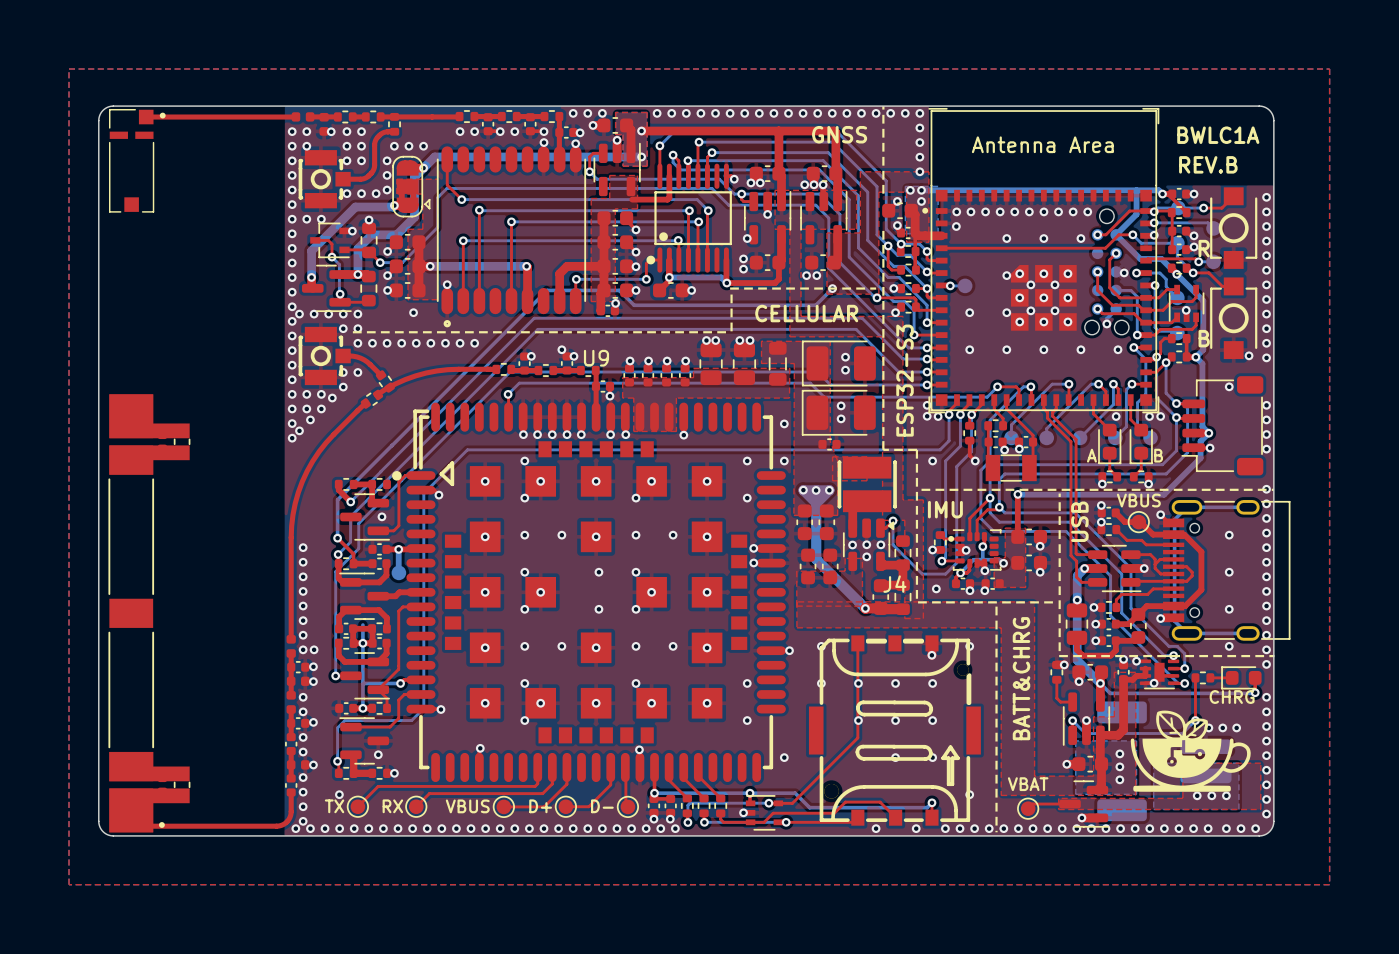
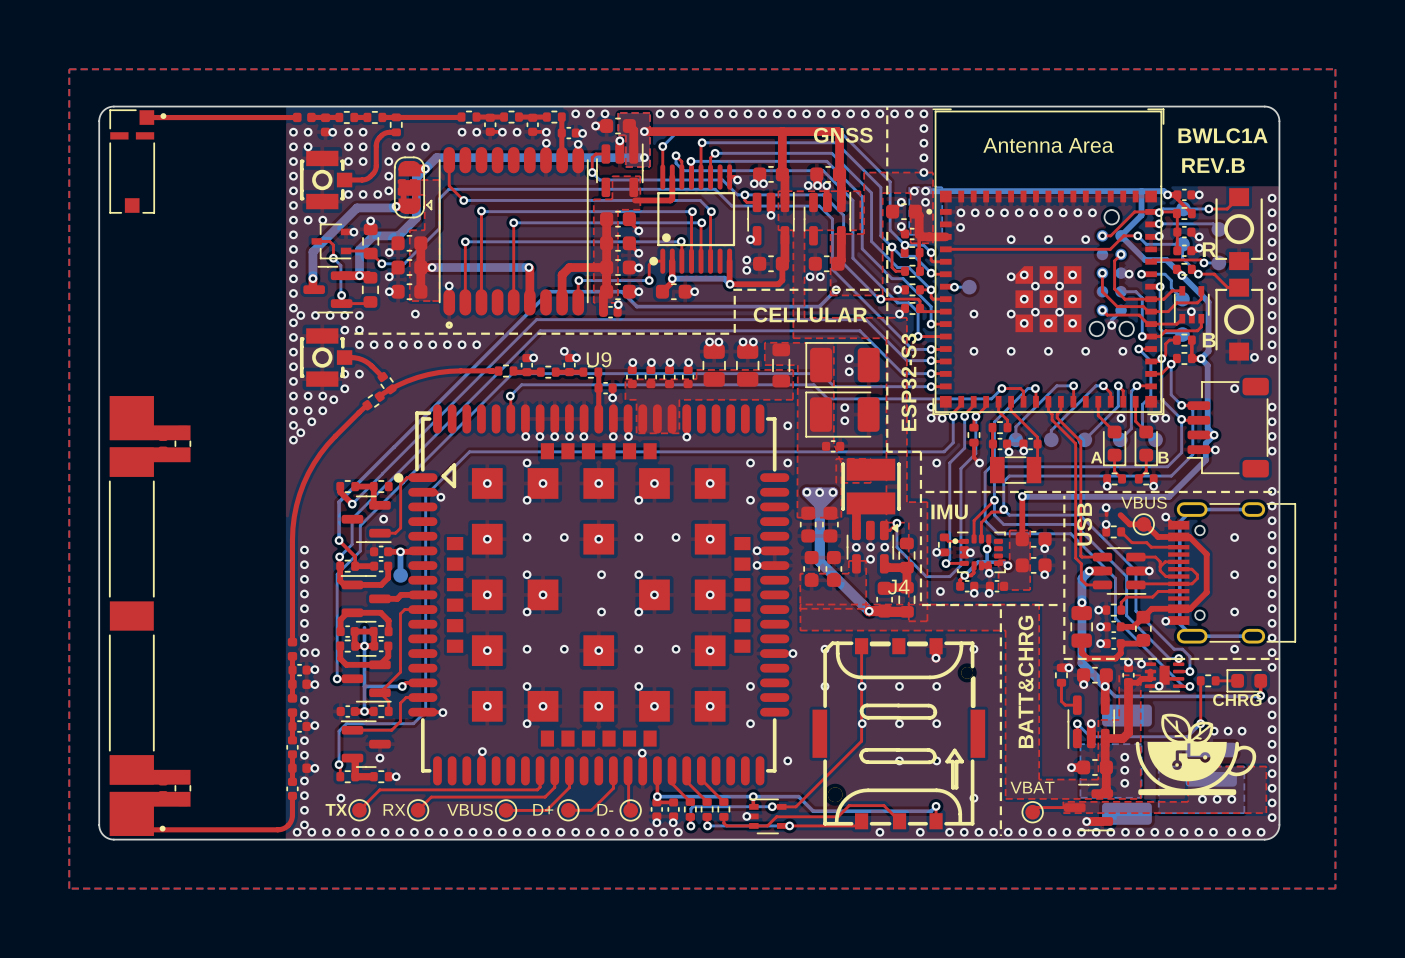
part: (1108, 512) -> none

